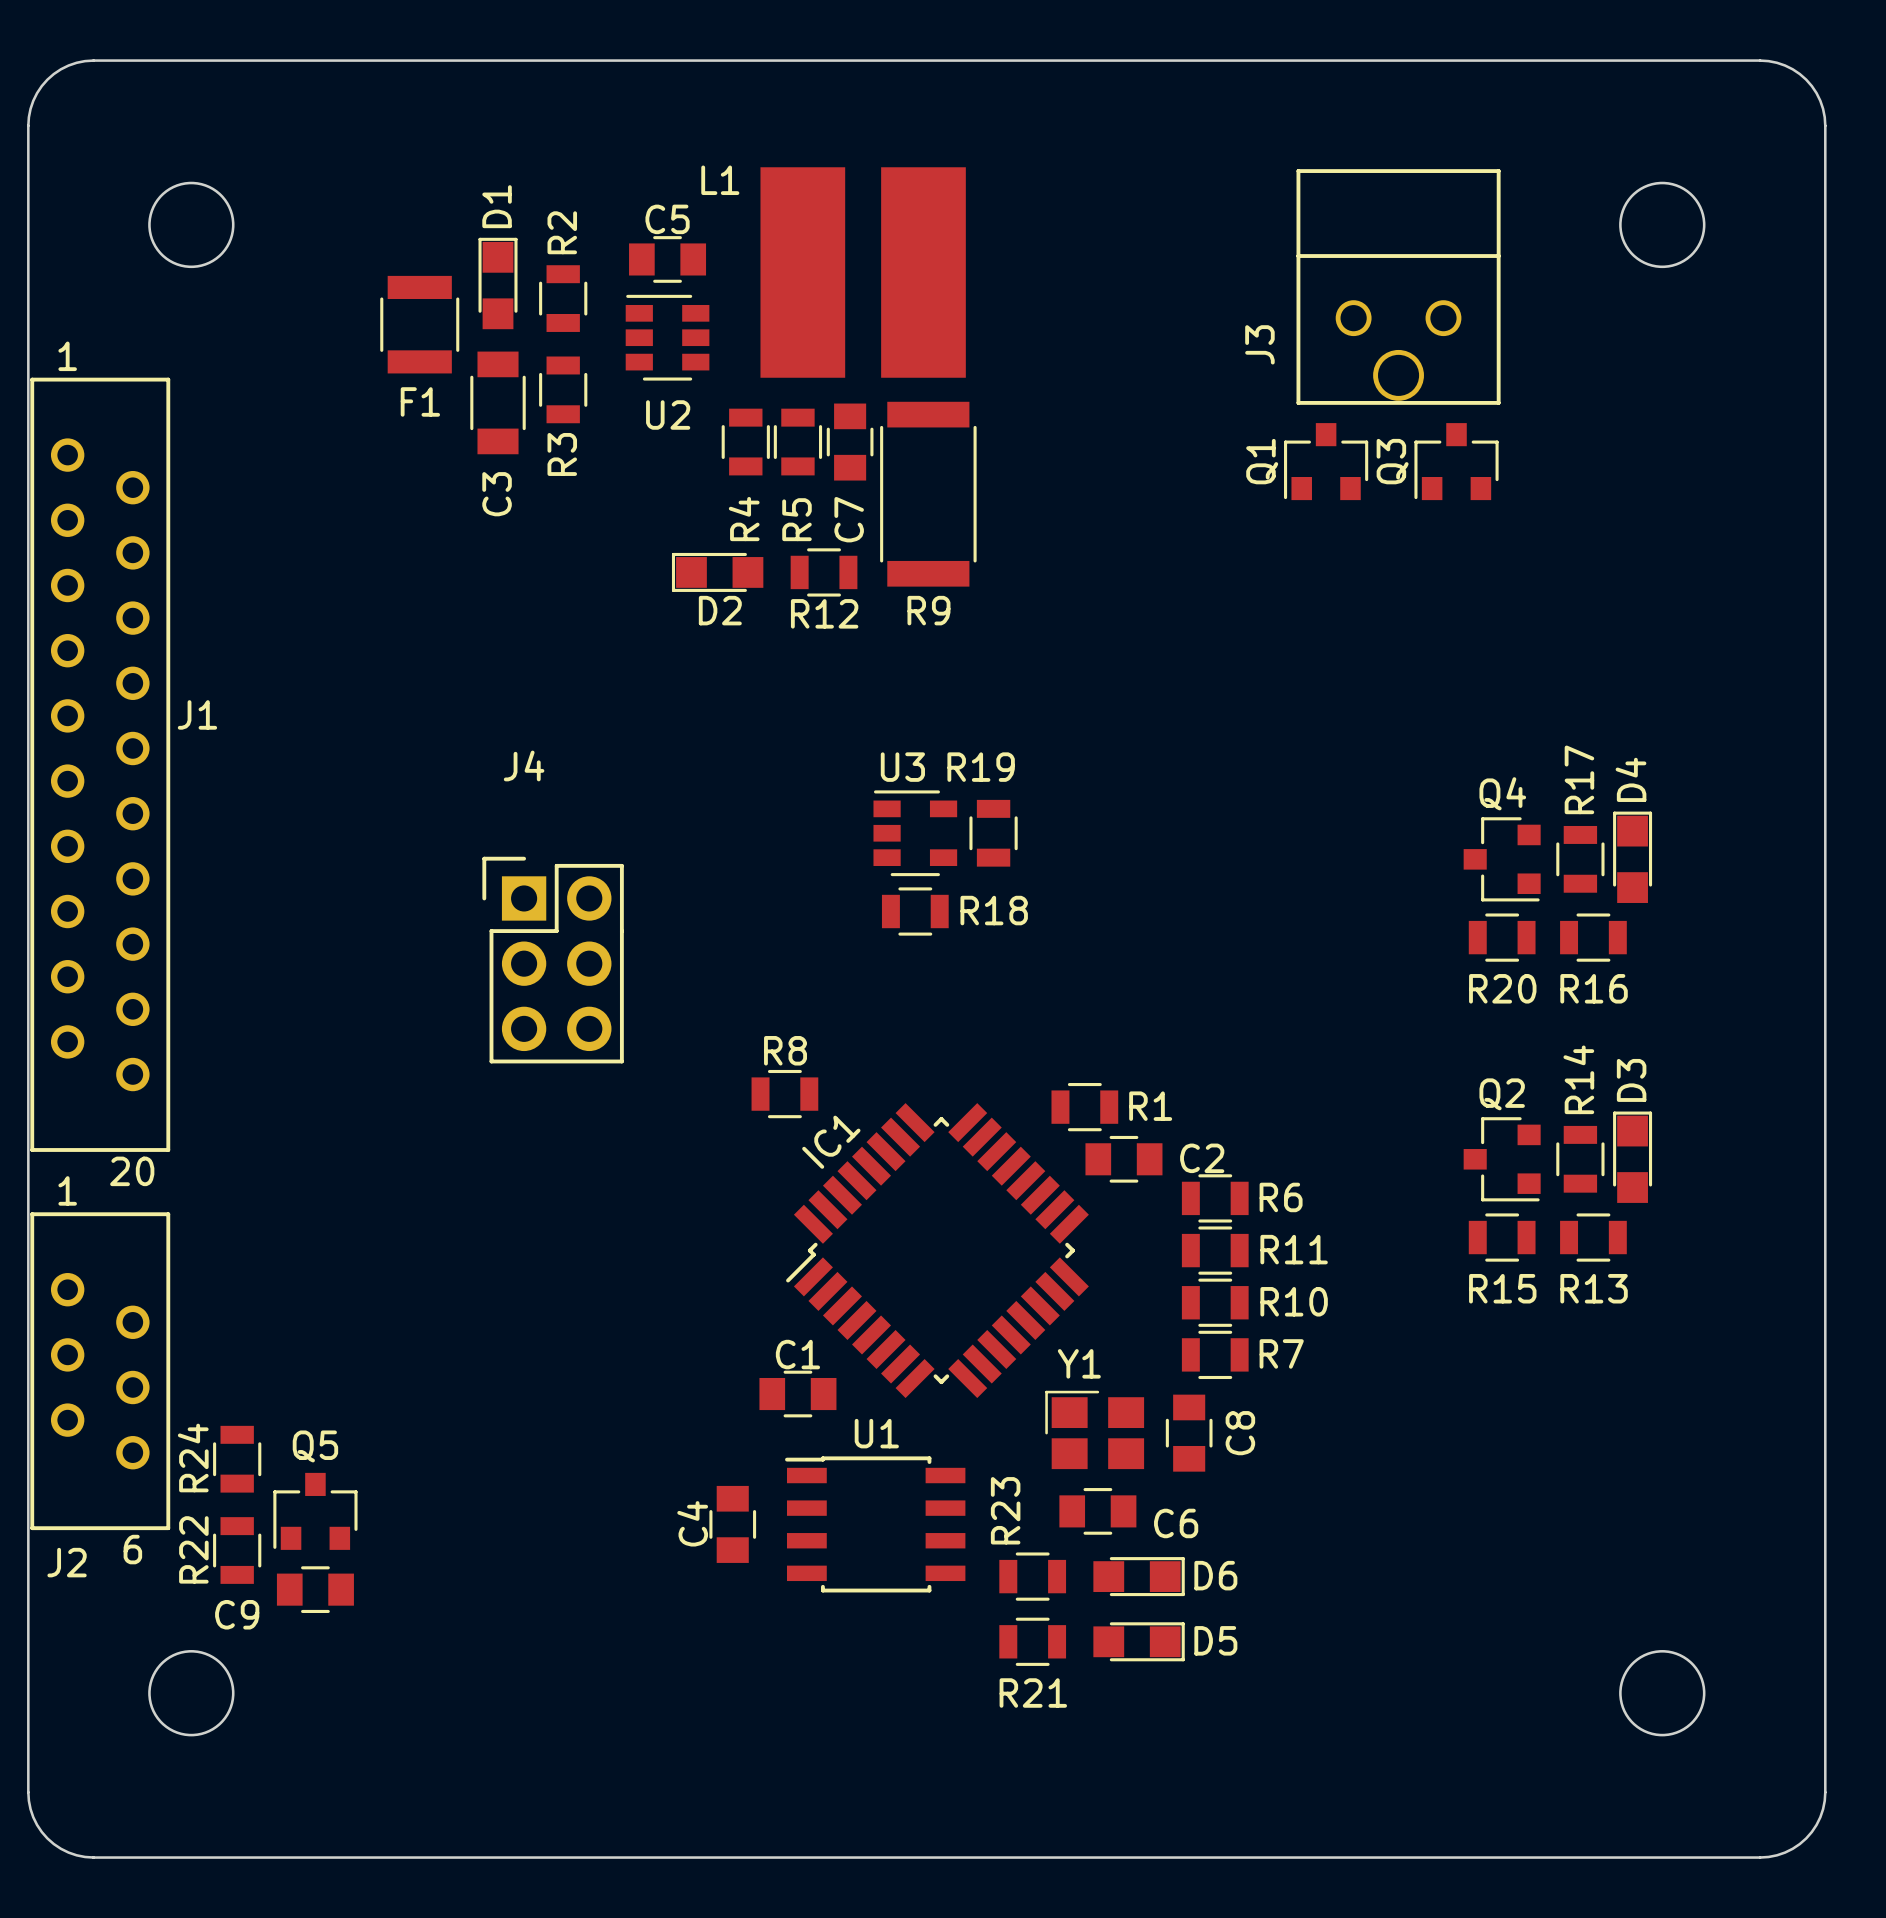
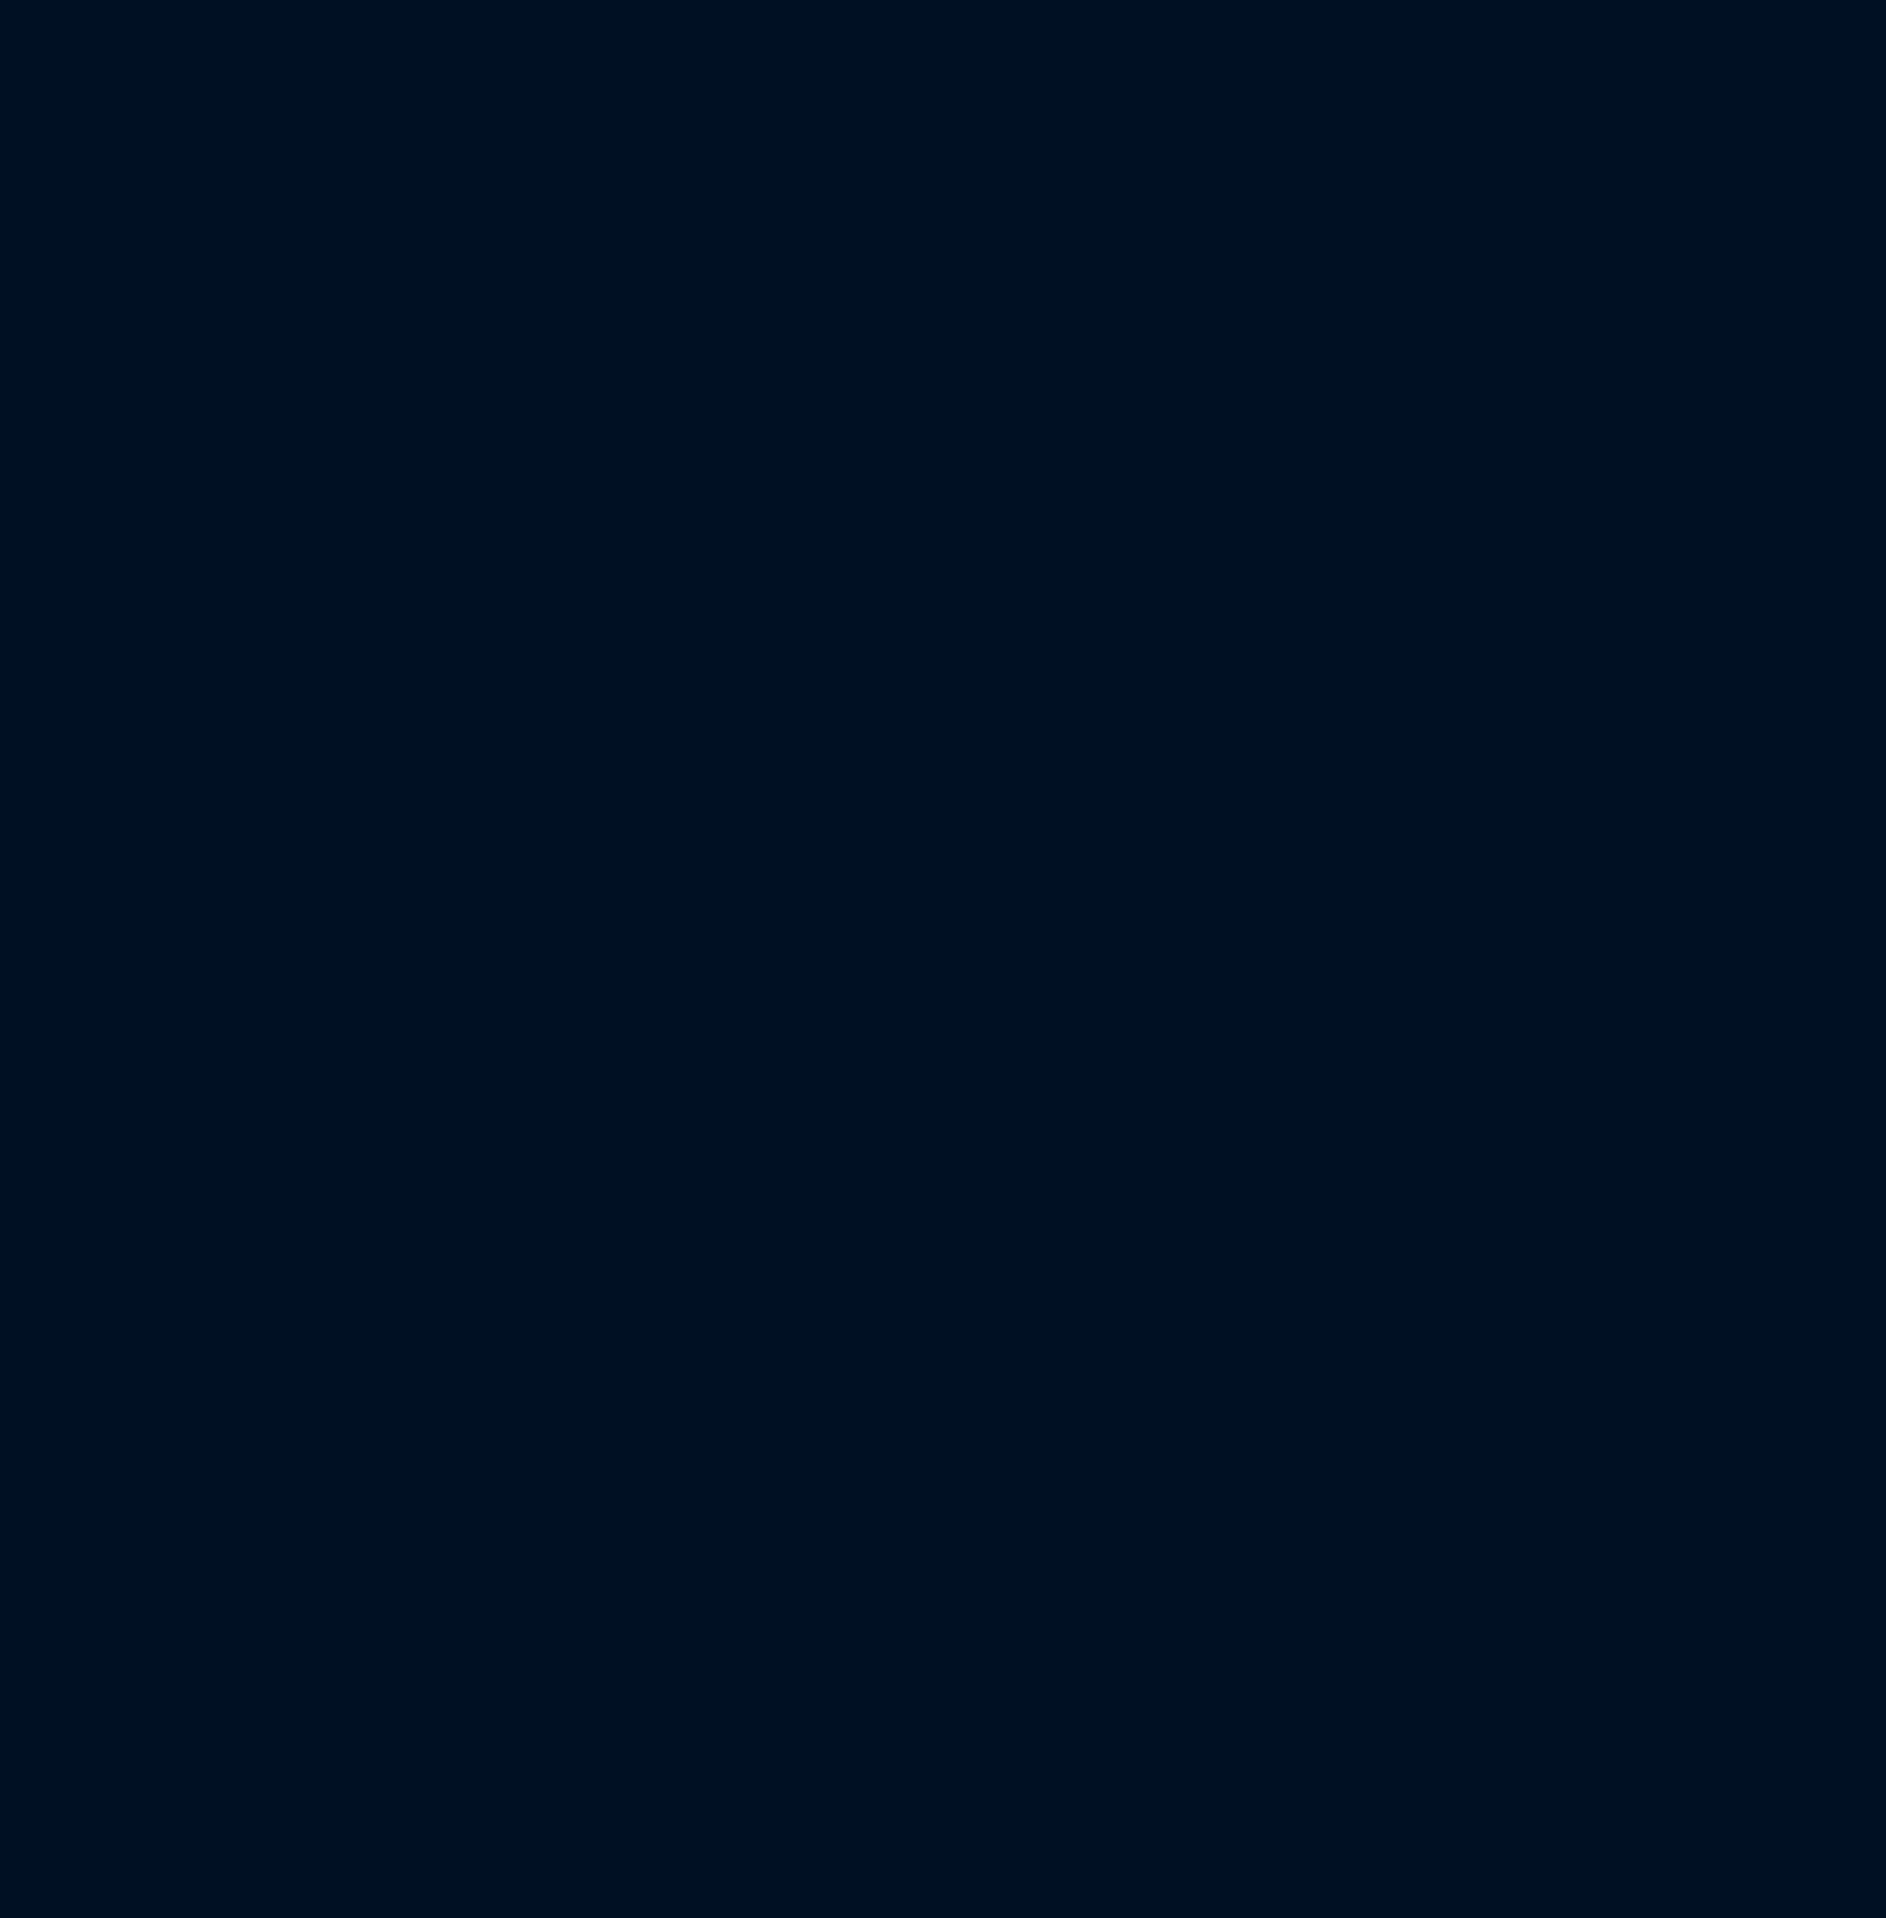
board edge: (93, 60) (1760, 60) (1785, 65) (1806, 79) (1820, 100) (1825, 125) (1825, 1792) (1820, 1817) (1806, 1838) (1785, 1852) (1760, 1857) (93, 1857) (68, 1852) (47, 1838) (33, 1817) (28, 1792) (28, 125) (33, 100) (47, 79) (68, 65) (93, 60) -> none
round board edge: [148, 181, 235, 269] -> none
round board edge: [1619, 181, 1706, 269] -> none
C5: (667, 259) -> none
L1: (863, 272) -> none
D1: (498, 283) -> none
J3: (1398, 286) -> none
R2: (563, 298) -> none
F1: (419, 324) -> none
U2: (667, 337) -> none
R3: (563, 389) -> none
C3: (498, 402) -> none
R4: (745, 442) -> none
R5: (797, 442) -> none
C7: (850, 442) -> none
Q1: (1326, 461) -> none
Q3: (1456, 461) -> none
R9: (928, 494) -> none
D2: (717, 572) -> none
R12: (824, 572) -> none
J1: (100, 764) -> none
U3: (915, 833) -> none
R19: (993, 833) -> none
D4: (1632, 857) -> none
Q4: (1502, 859) -> none
R17: (1580, 859) -> none
R18: (915, 911) -> none
R20: (1502, 937) -> none
R16: (1593, 937) -> none
J4: (553, 960) -> none
R8: (784, 1094) -> none
R1: (1084, 1107) -> none
D3: (1632, 1157) -> none
C2: (1123, 1159) -> none
Q2: (1502, 1159) -> none
R14: (1580, 1159) -> none
R6: (1215, 1198) -> none
R15: (1502, 1237) -> none
R13: (1593, 1237) -> none
IC1: (937, 1250) -> none
R11: (1215, 1250) -> none
R10: (1215, 1302) -> none
R7: (1215, 1354) -> none
J2: (100, 1371) -> none
C1: (797, 1394) -> none
Y1: (1094, 1429) -> none
C8: (1189, 1433) -> none
R24: (237, 1459) -> none
Q5: (315, 1511) -> none
C6: (1097, 1511) -> none
C4: (732, 1524) -> none
U1: (875, 1524) -> none
R22: (237, 1550) -> none
R23: (1032, 1576) -> none
D6: (1139, 1576) -> none
C9: (315, 1589) -> none
R21: (1032, 1641) -> none
D5: (1139, 1641) -> none
round board edge: [148, 1650, 235, 1737] -> none
round board edge: [1619, 1650, 1706, 1737] -> none

